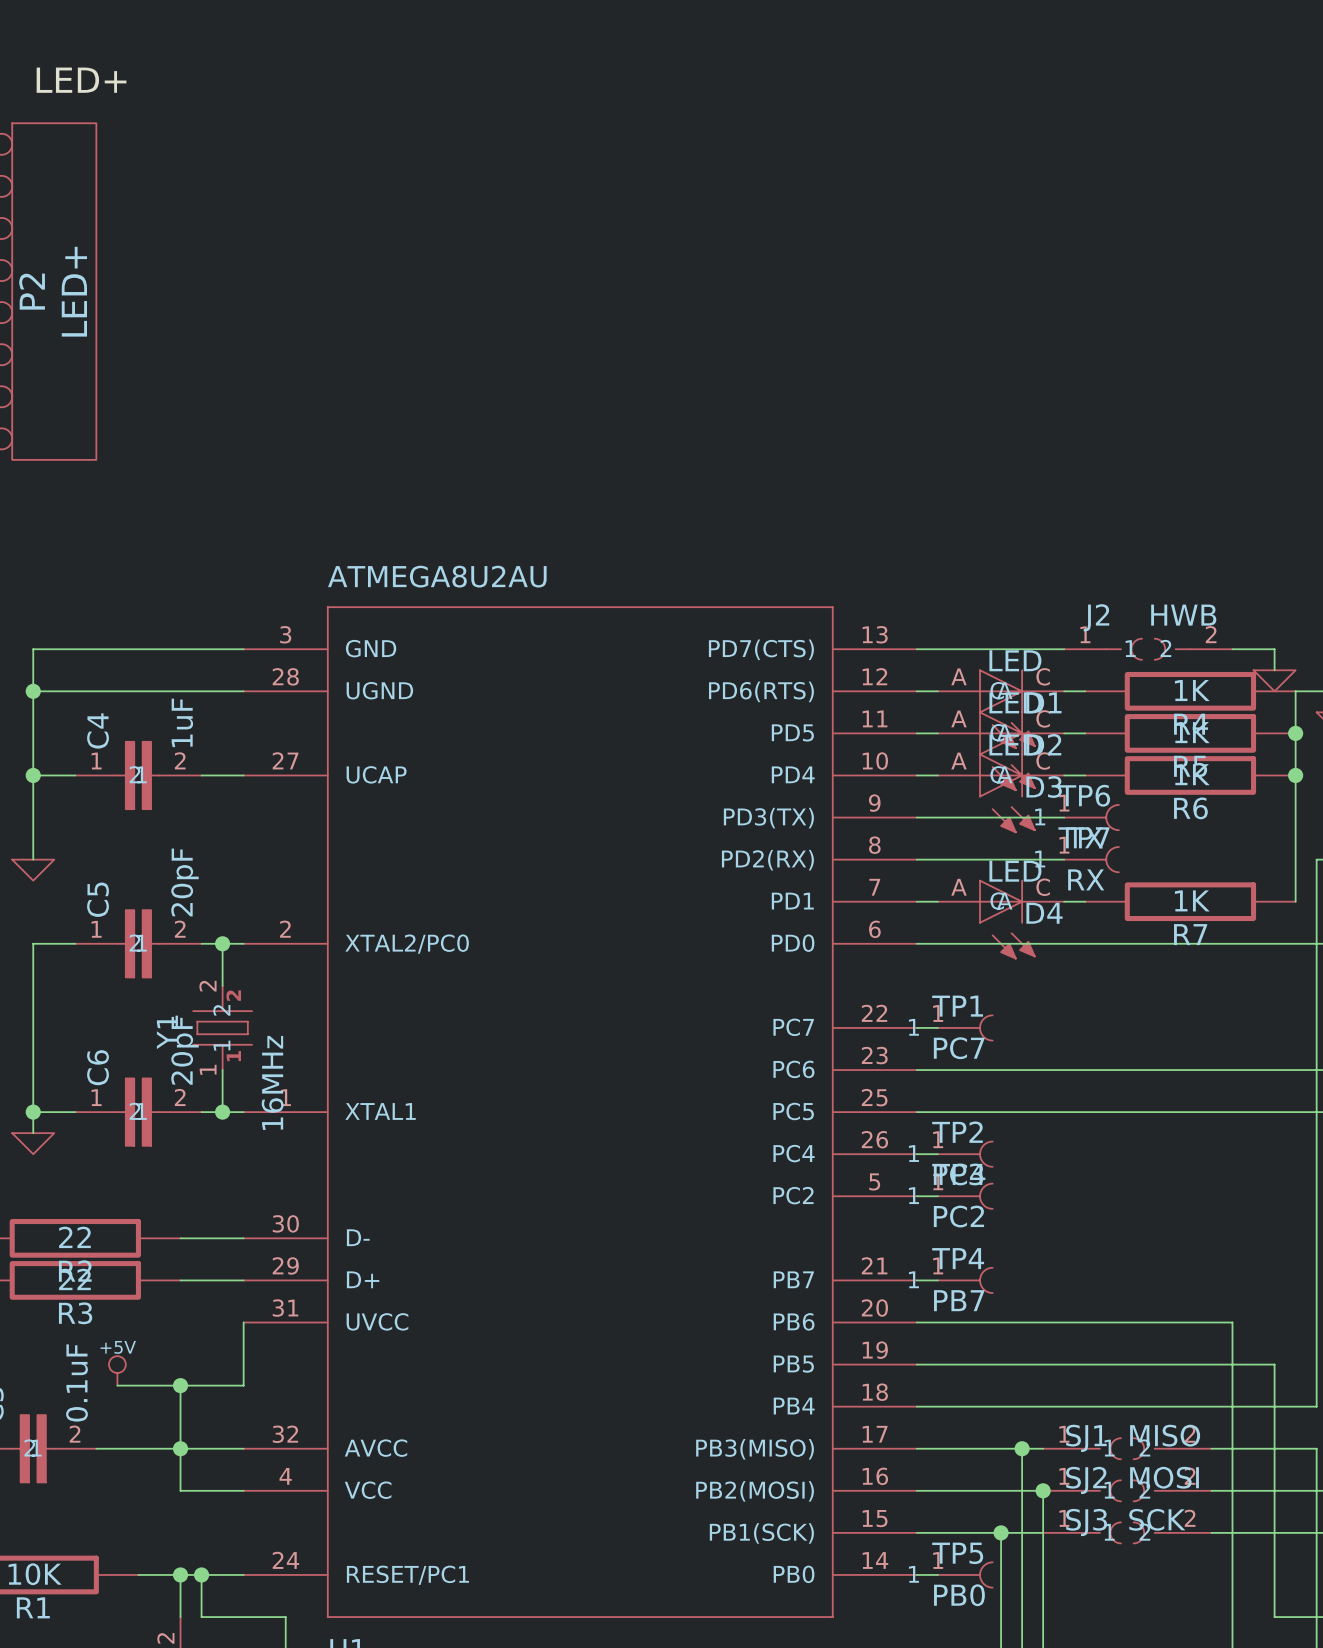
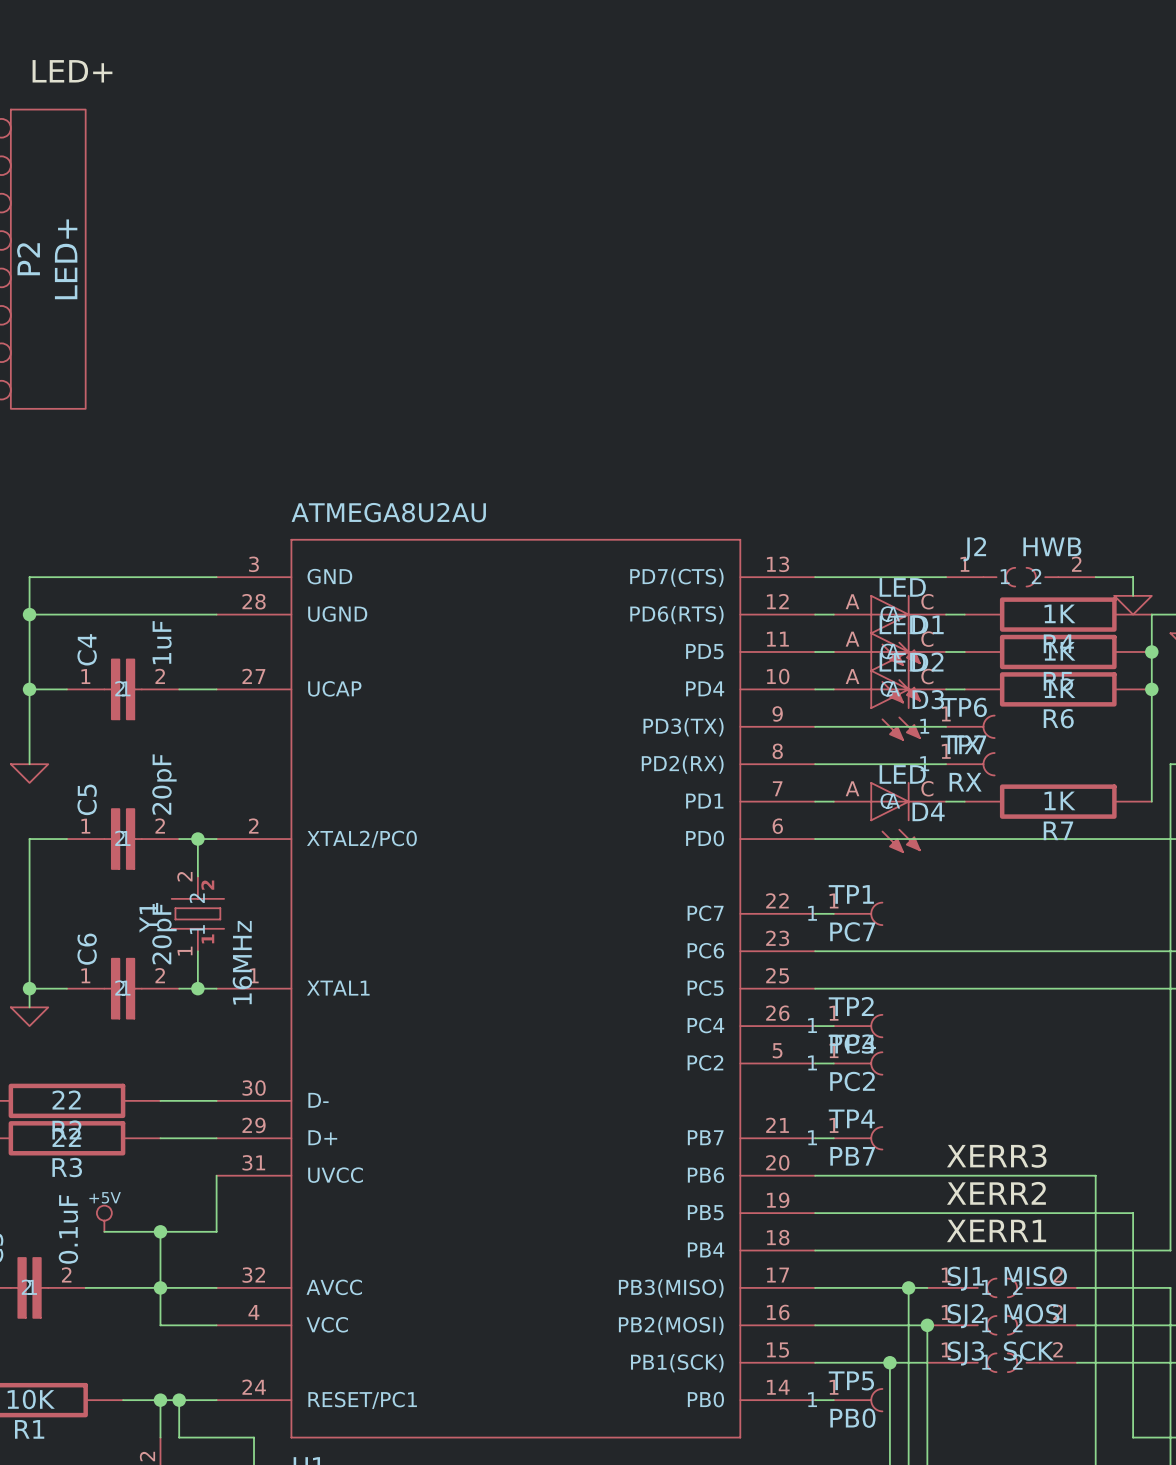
label: none -> XERR3 (996, 1156)
label: none -> XERR2 (996, 1193)
label: none -> XERR1 (996, 1230)

